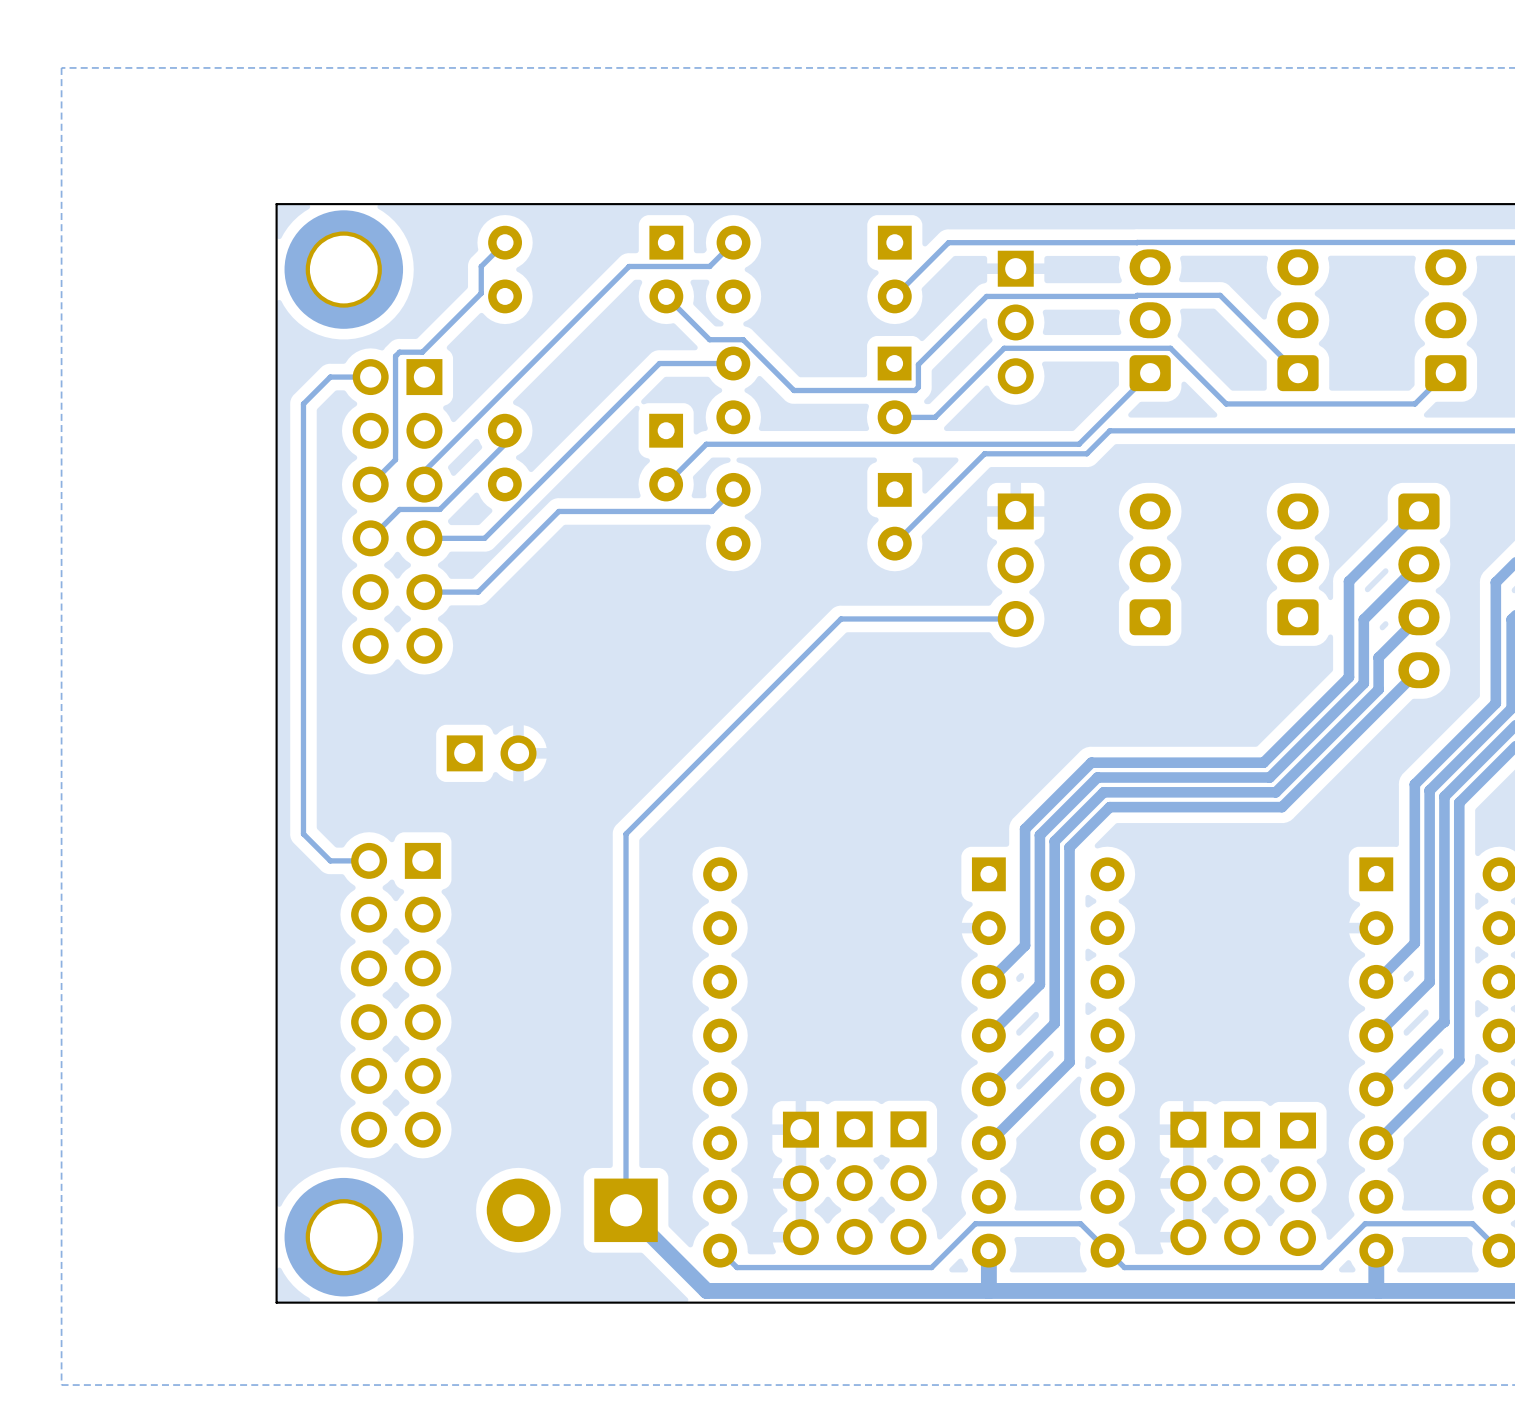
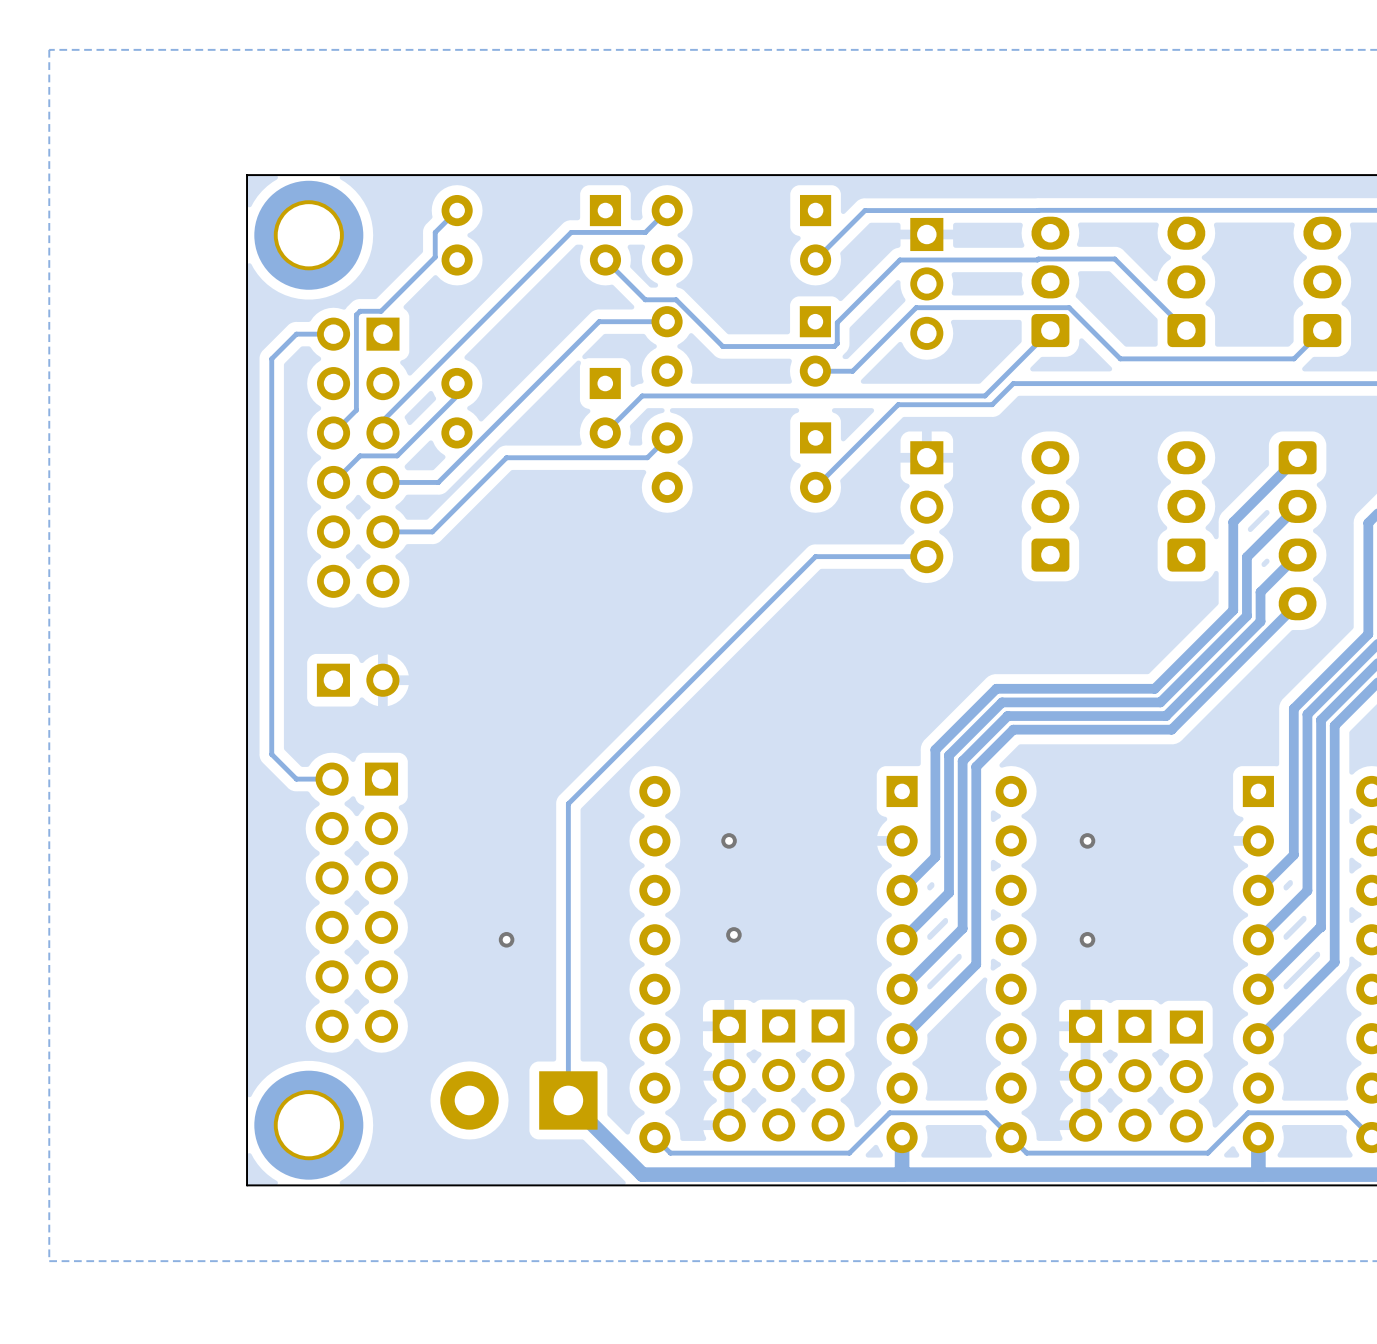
track: (894, 618) (841, 618) (626, 834) (626, 887) -> (815, 556) (568, 803)
part position: (491, 753) -> (358, 680)
via: none -> (729, 840)
via: none -> (1087, 840)
via: none -> (733, 934)
via: none -> (506, 939)
via: none -> (1087, 939)

